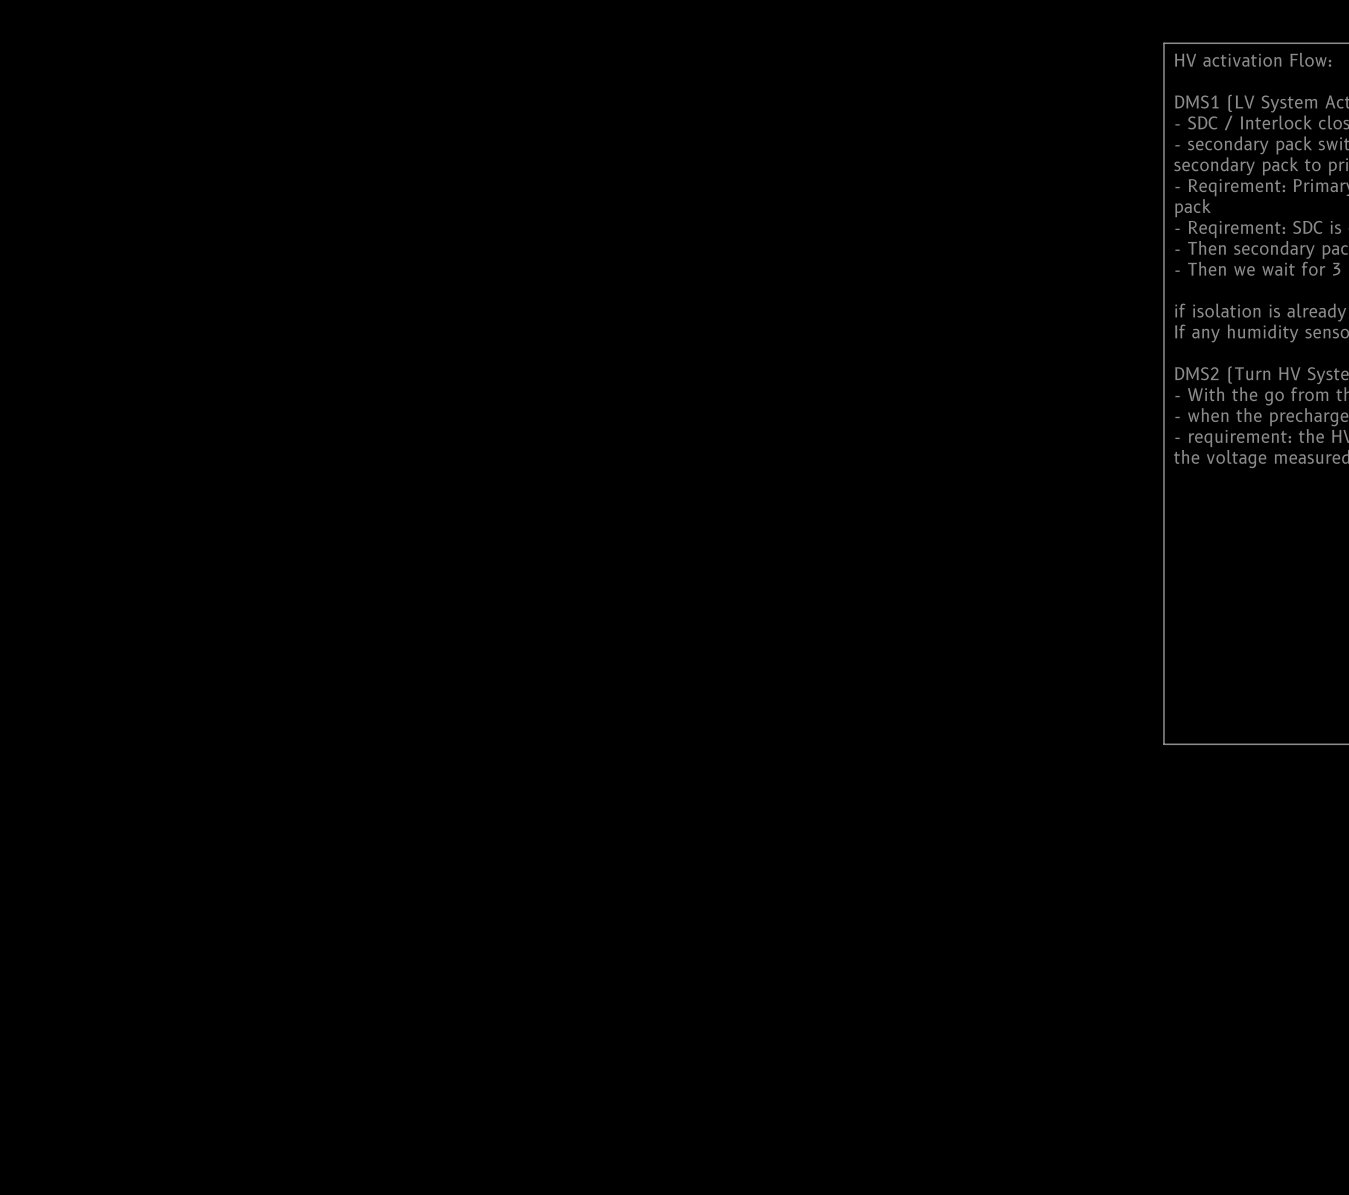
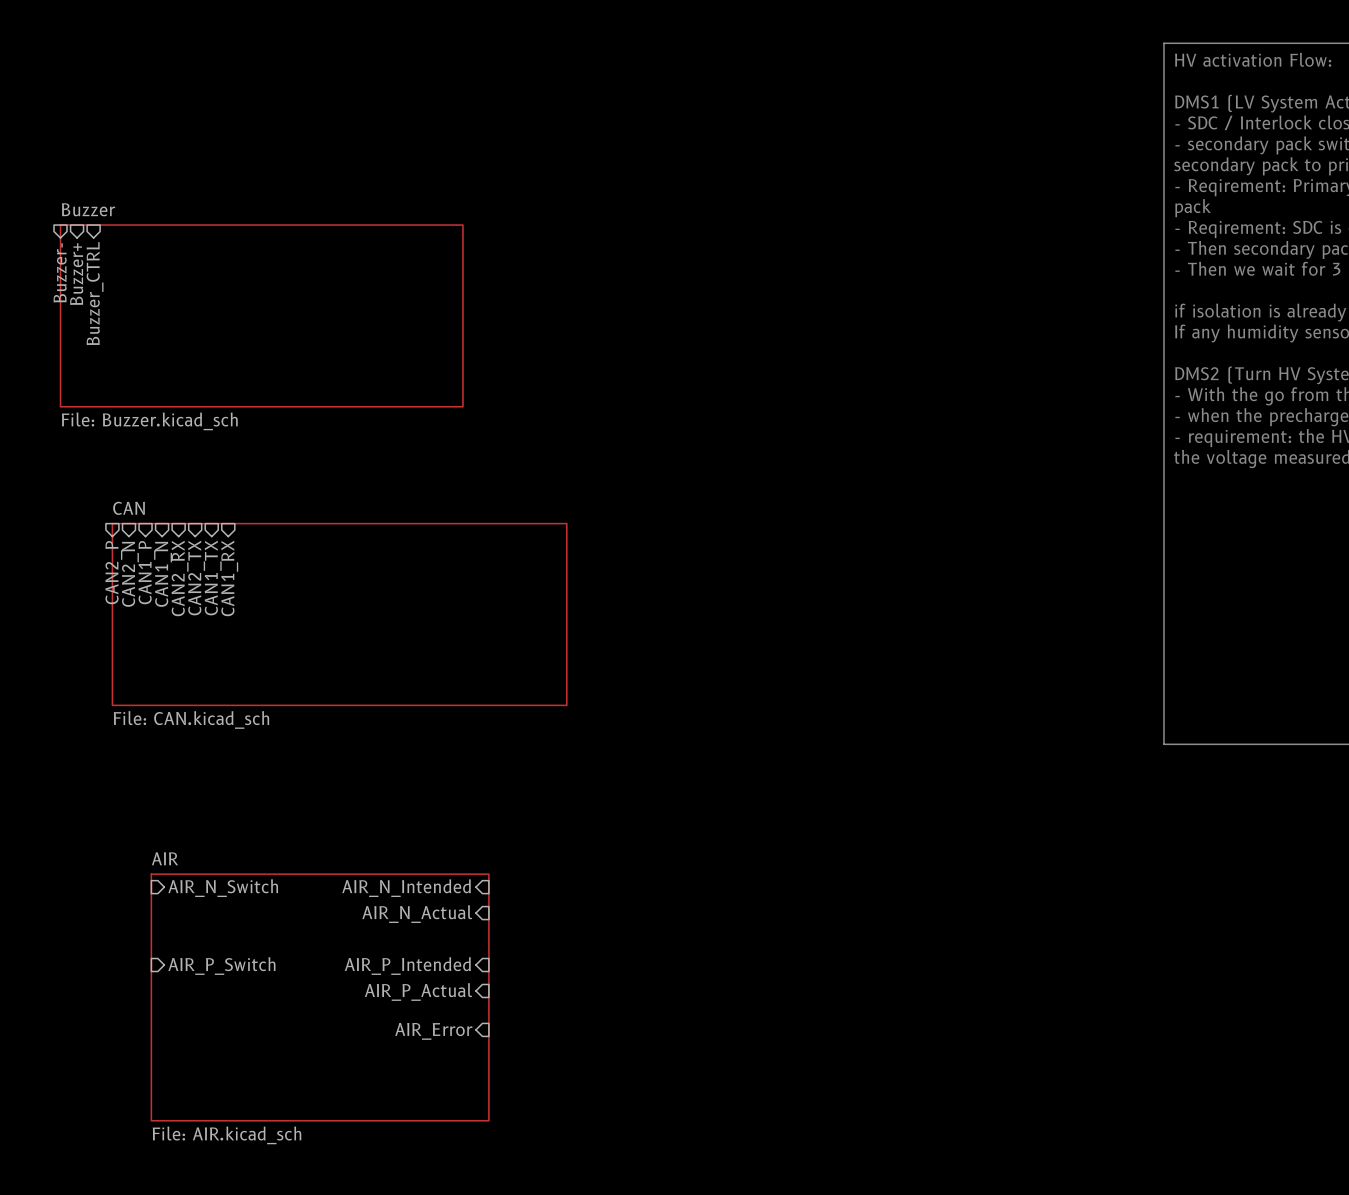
sheet pin: none -> Buzzer- (60, 272)
sheet pin: none -> Buzzer+ (76, 274)
sheet pin: none -> Buzzer_CTRL (95, 293)
sheet Buzzer: none -> File: Buzzer.kicad_sch (261, 315)
sheet pin: none -> CAN2_P (113, 572)
sheet pin: none -> CAN1_P (146, 572)
sheet pin: none -> CAN2_N (130, 574)
sheet pin: none -> CAN1_N (163, 574)
sheet pin: none -> CAN2_RX (180, 578)
sheet pin: none -> CAN2_TX (196, 578)
sheet pin: none -> CAN1_TX (213, 578)
sheet pin: none -> CAN1_RX (229, 578)
sheet CAN: none -> File: CAN.kicad_sch (339, 614)
sheet pin: none -> AIR_N_Switch (223, 888)
sheet pin: none -> AIR_N_Intended (406, 888)
sheet pin: none -> AIR_N_Actual (417, 914)
sheet pin: none -> AIR_P_Switch (221, 966)
sheet pin: none -> AIR_P_Intended (407, 966)
sheet pin: none -> AIR_P_Actual (418, 992)
sheet AIR: none -> File: AIR.kicad_sch (320, 997)
sheet pin: none -> AIR_Error (433, 1031)

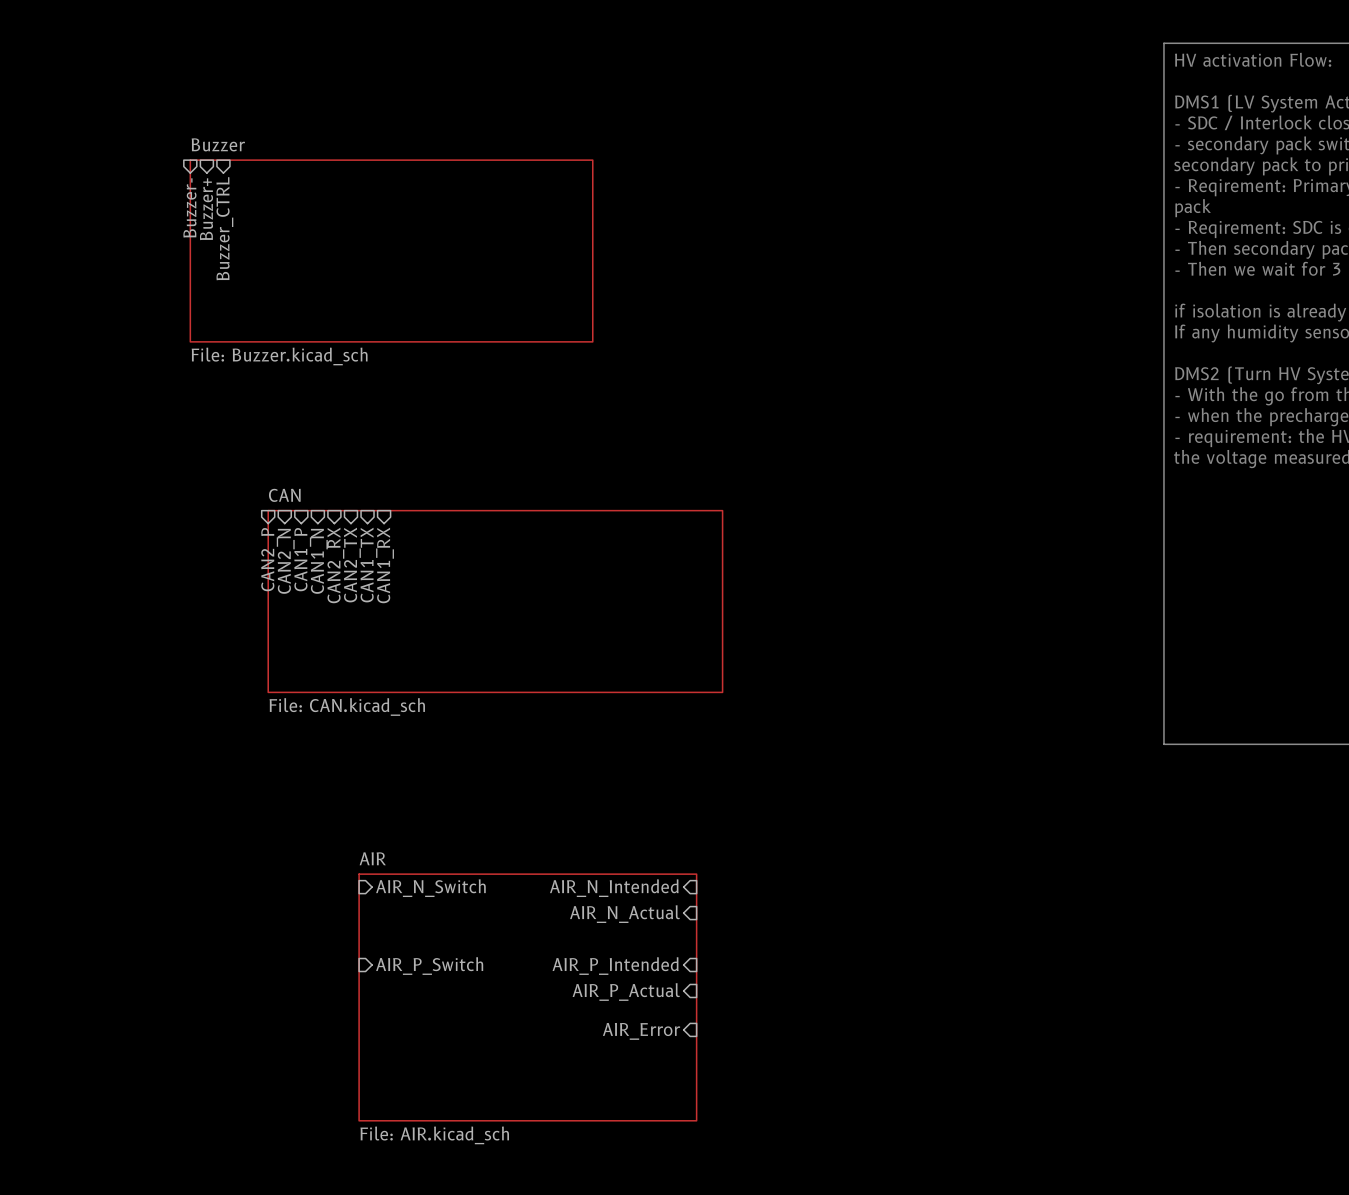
sheet pin position: Buzzer- (60, 272) -> Buzzer- (189, 207)
sheet pin position: Buzzer+ (76, 274) -> Buzzer+ (206, 209)
sheet pin position: Buzzer_CTRL (95, 293) -> Buzzer_CTRL (224, 228)
sheet Buzzer position: (261, 315) -> (391, 251)
sheet pin position: CAN2_P (113, 572) -> CAN2_P (269, 559)
sheet pin position: CAN1_P (146, 572) -> CAN1_P (302, 559)
sheet pin position: CAN2_N (130, 574) -> CAN2_N (286, 561)
sheet pin position: CAN1_N (163, 574) -> CAN1_N (319, 561)
sheet pin position: CAN2_RX (180, 578) -> CAN2_RX (335, 565)
sheet pin position: CAN2_TX (196, 578) -> CAN2_TX (352, 565)
sheet pin position: CAN1_TX (213, 578) -> CAN1_TX (368, 565)
sheet pin position: CAN1_RX (229, 578) -> CAN1_RX (385, 565)
sheet CAN position: (339, 614) -> (495, 601)
sheet pin position: AIR_N_Switch (223, 888) -> AIR_N_Switch (430, 888)
sheet pin position: AIR_N_Intended (406, 888) -> AIR_N_Intended (614, 888)
sheet pin position: AIR_N_Actual (417, 914) -> AIR_N_Actual (624, 914)
sheet pin position: AIR_P_Switch (221, 966) -> AIR_P_Switch (429, 966)
sheet pin position: AIR_P_Intended (407, 966) -> AIR_P_Intended (615, 966)
sheet pin position: AIR_P_Actual (418, 992) -> AIR_P_Actual (626, 992)
sheet AIR position: (320, 997) -> (527, 997)
sheet pin position: AIR_Error (433, 1031) -> AIR_Error (641, 1031)

